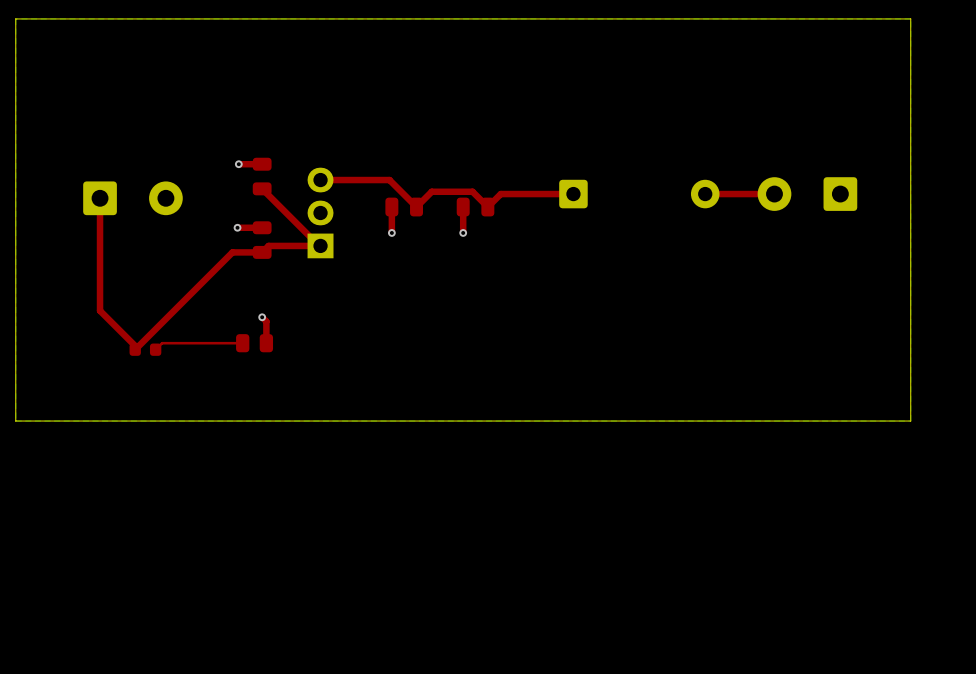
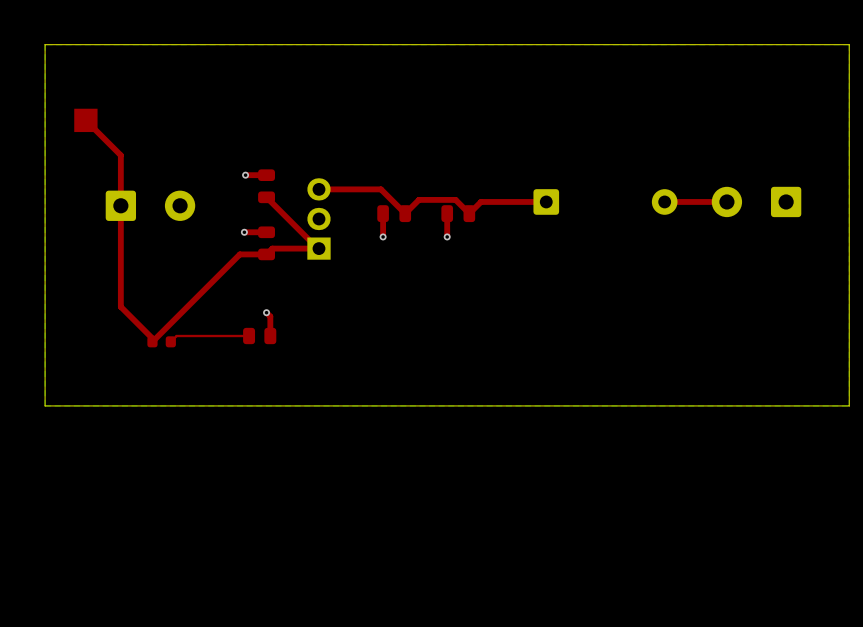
top track: none -> (85, 120) (120, 155) (120, 205)
part: none -> (85, 120)

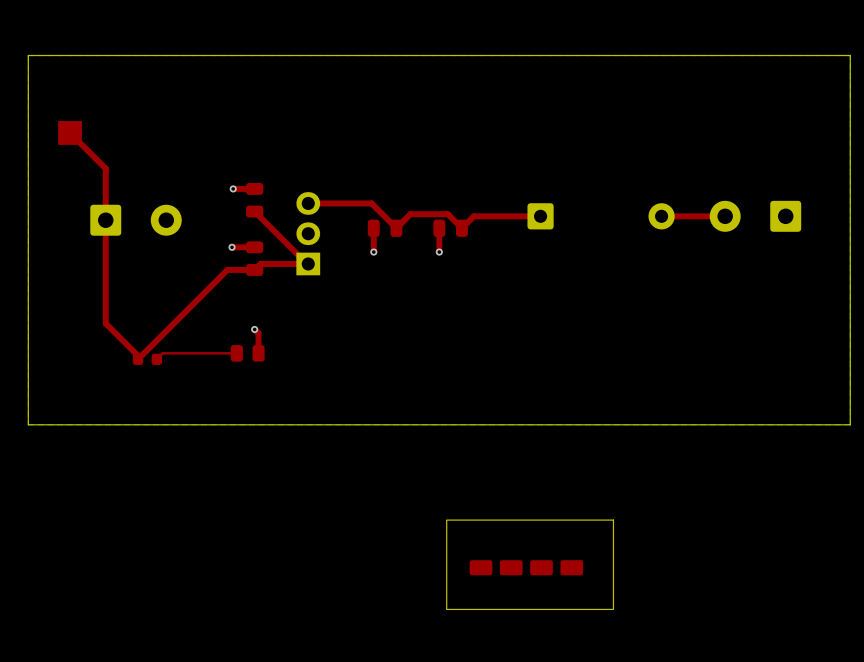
part: none -> (530, 564)

